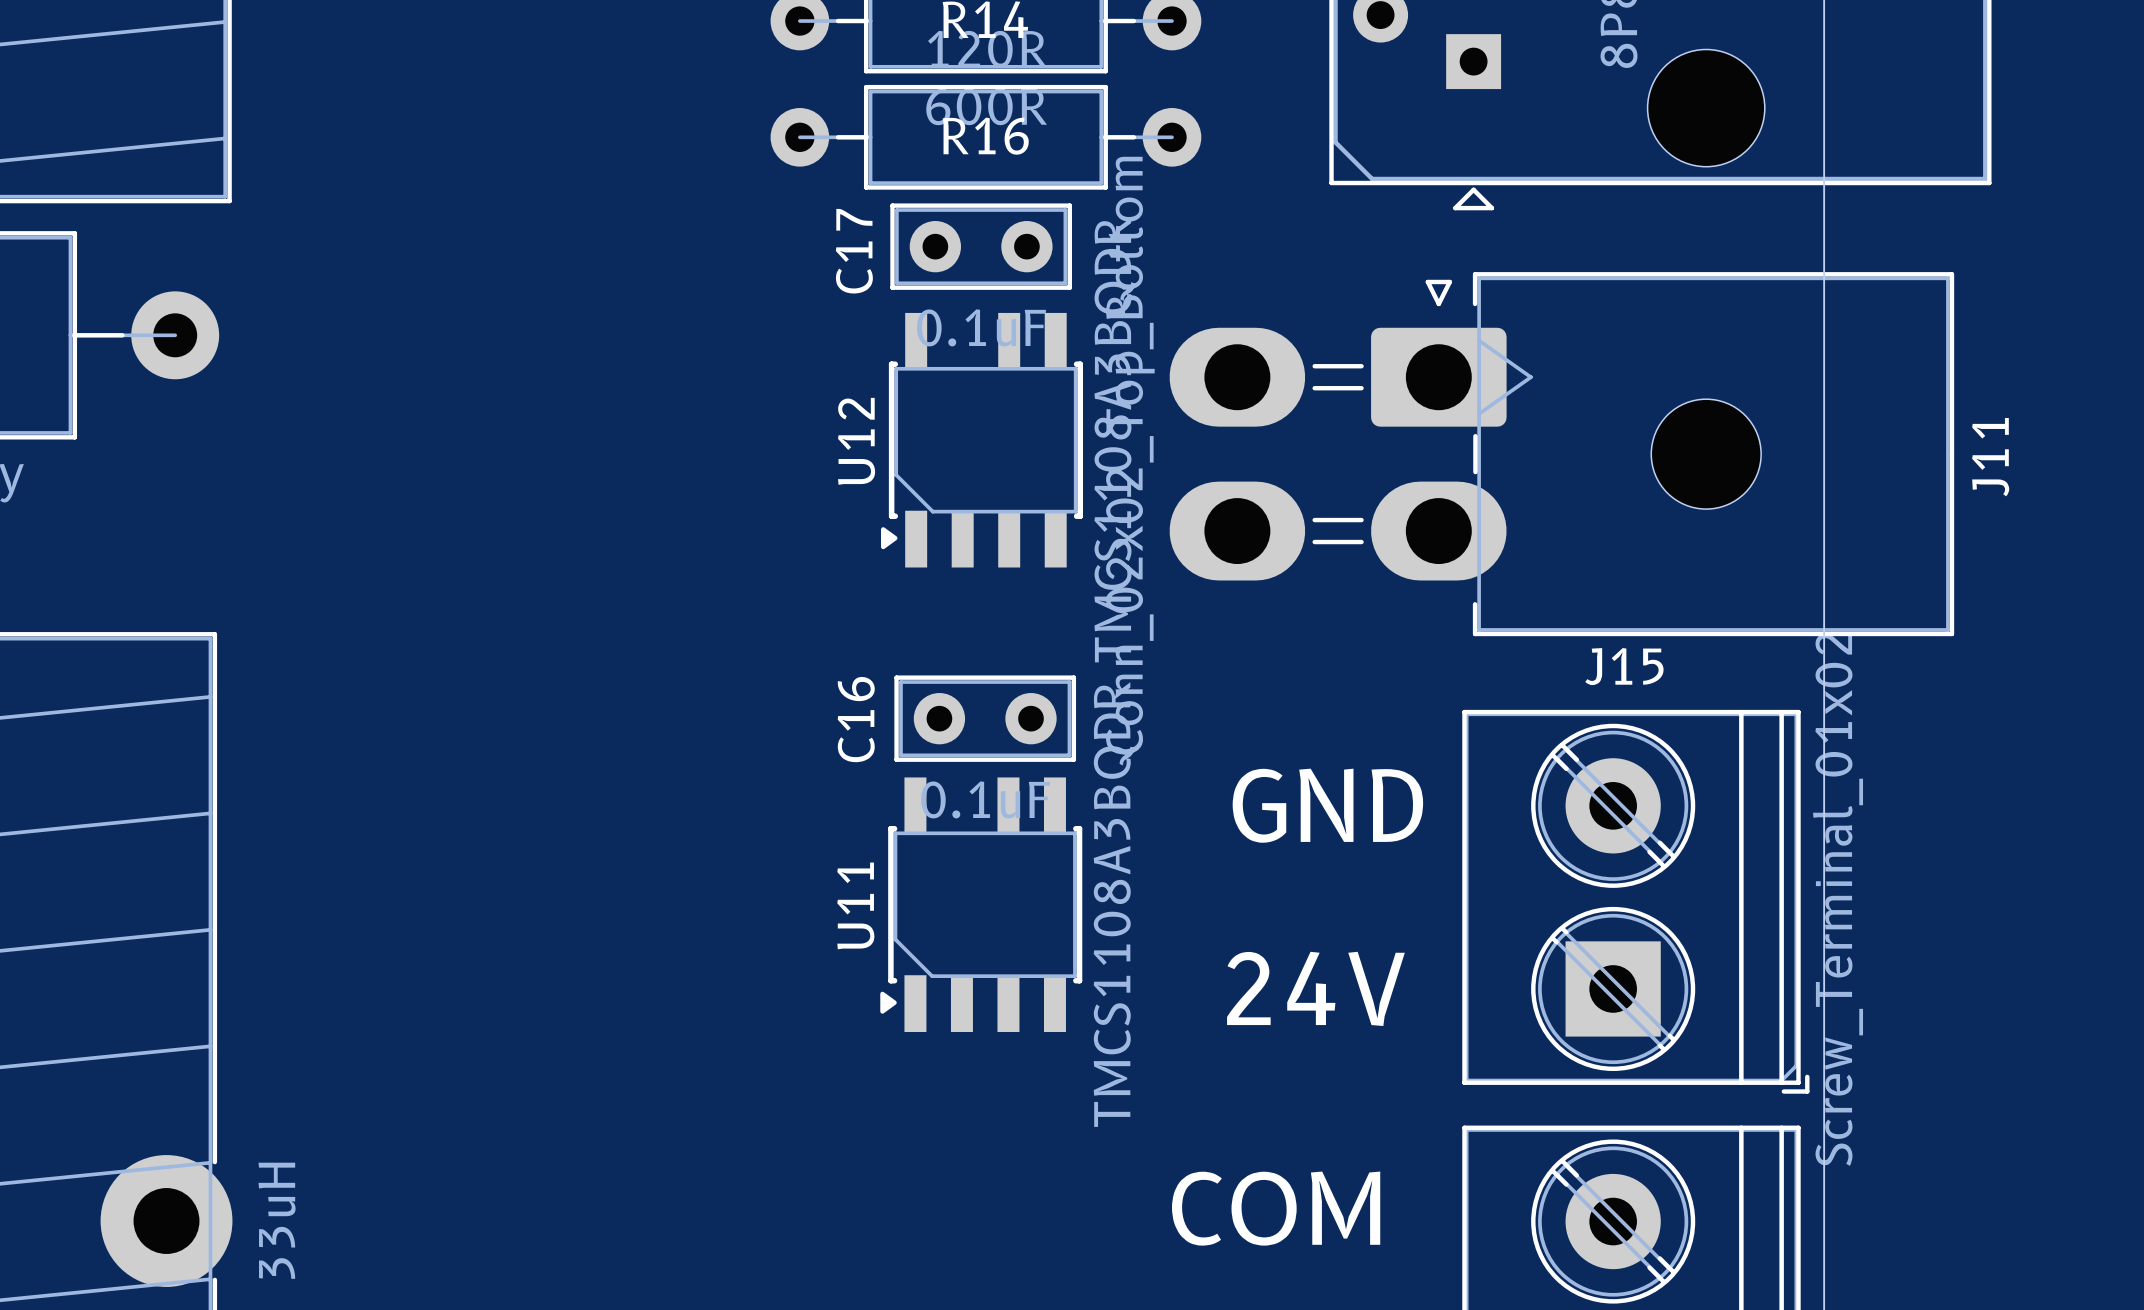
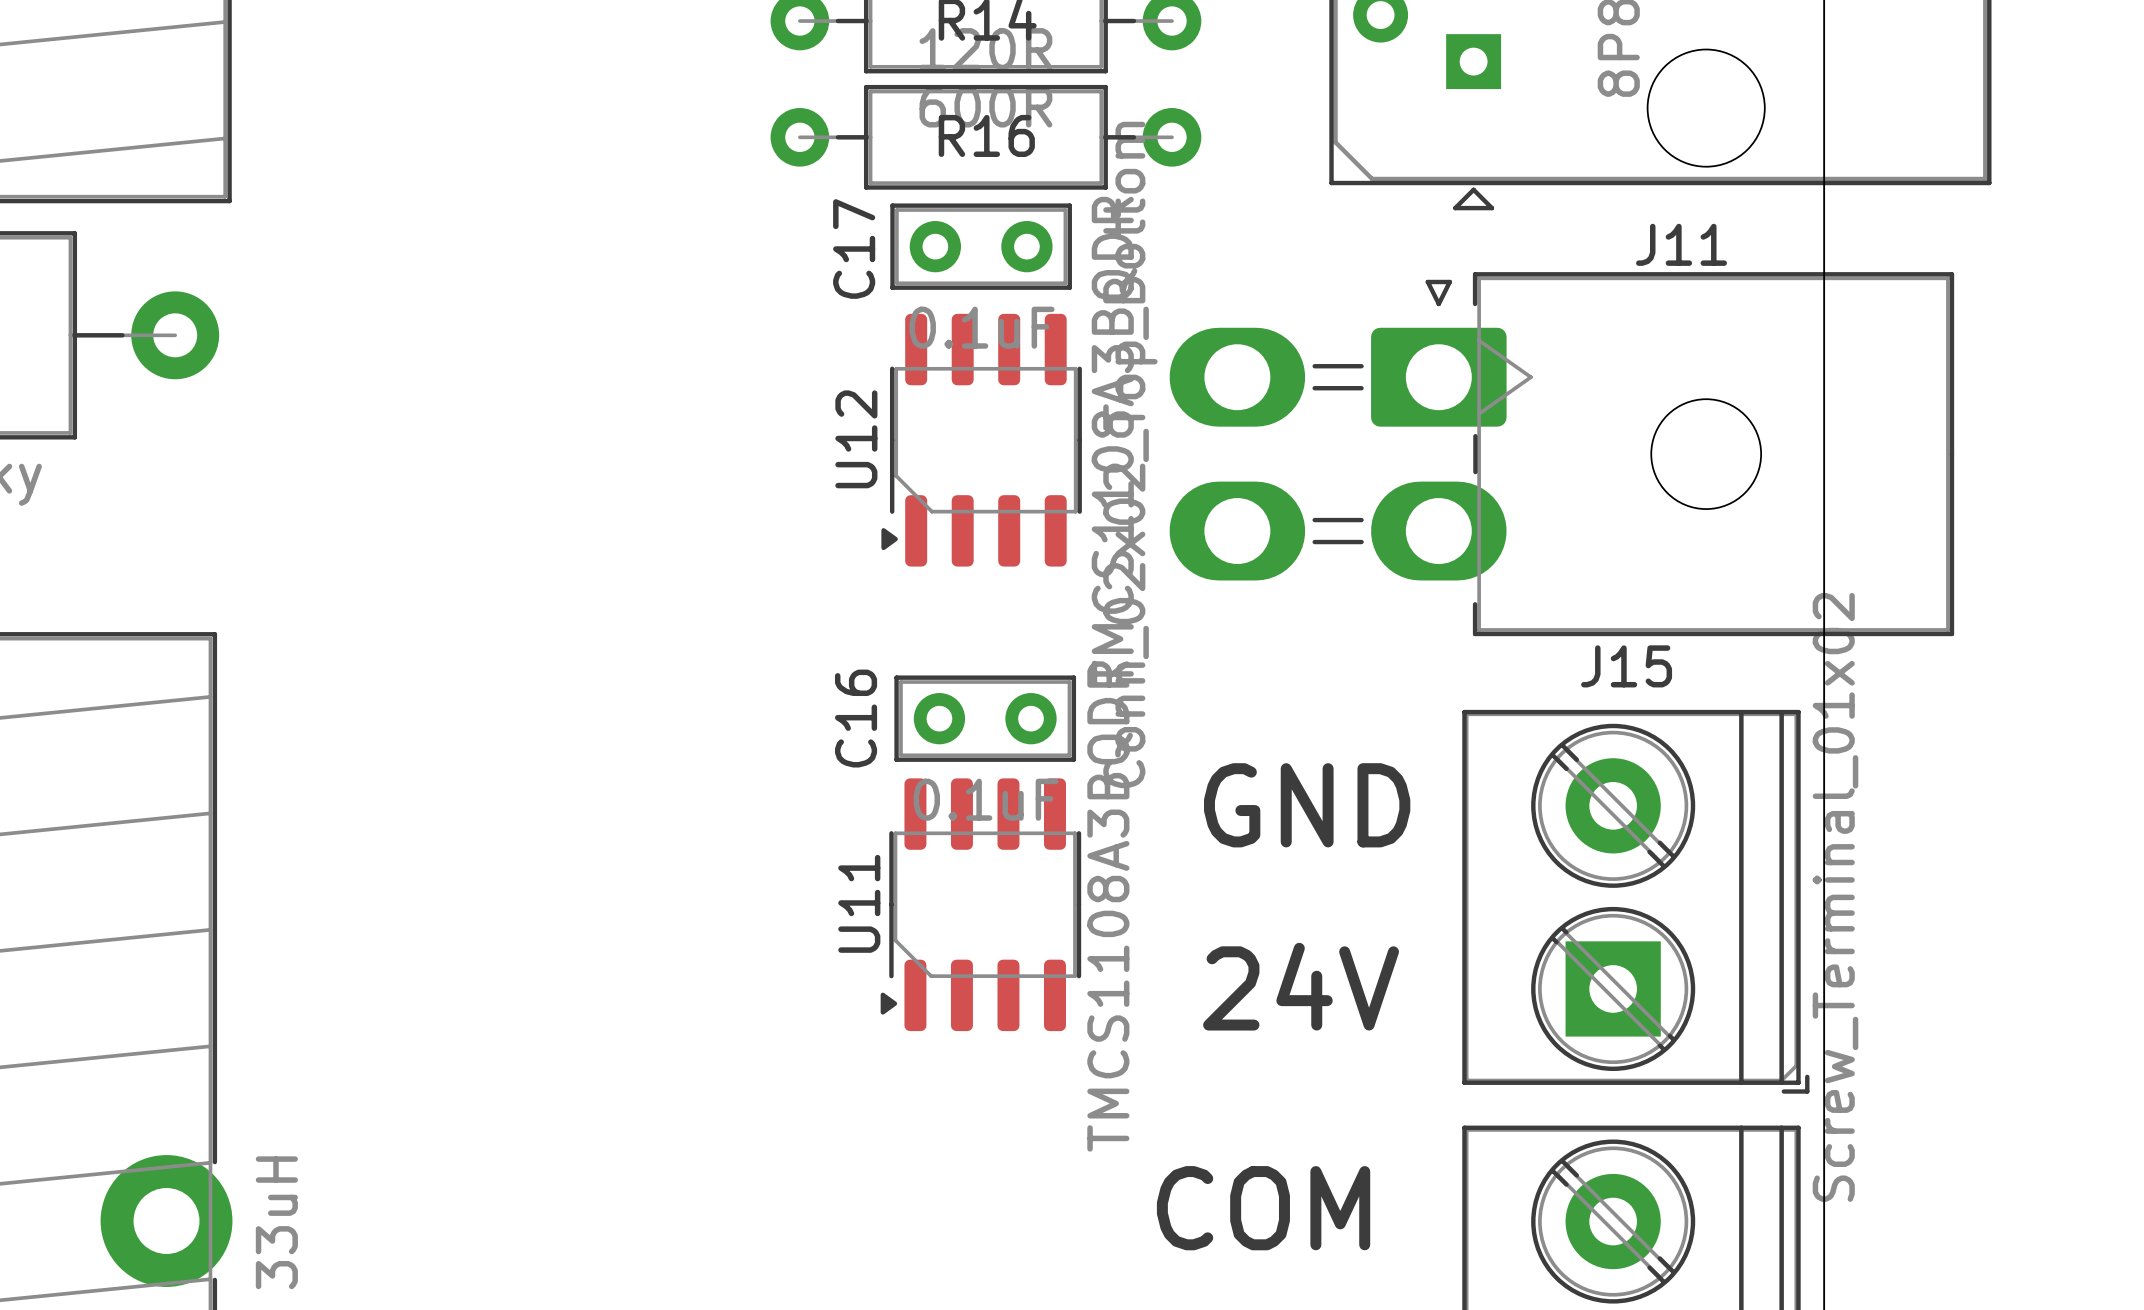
U12 footprint: [881, 312, 1084, 568] -> [881, 313, 1082, 567]
J11 name rotation: 0° (1990, 457) -> 90° clockwise (1681, 244)
J11 name position: J11 (1990, 457) -> J11 (1681, 244)
U11 footprint: [880, 777, 1083, 1033] -> [880, 778, 1082, 1032]

